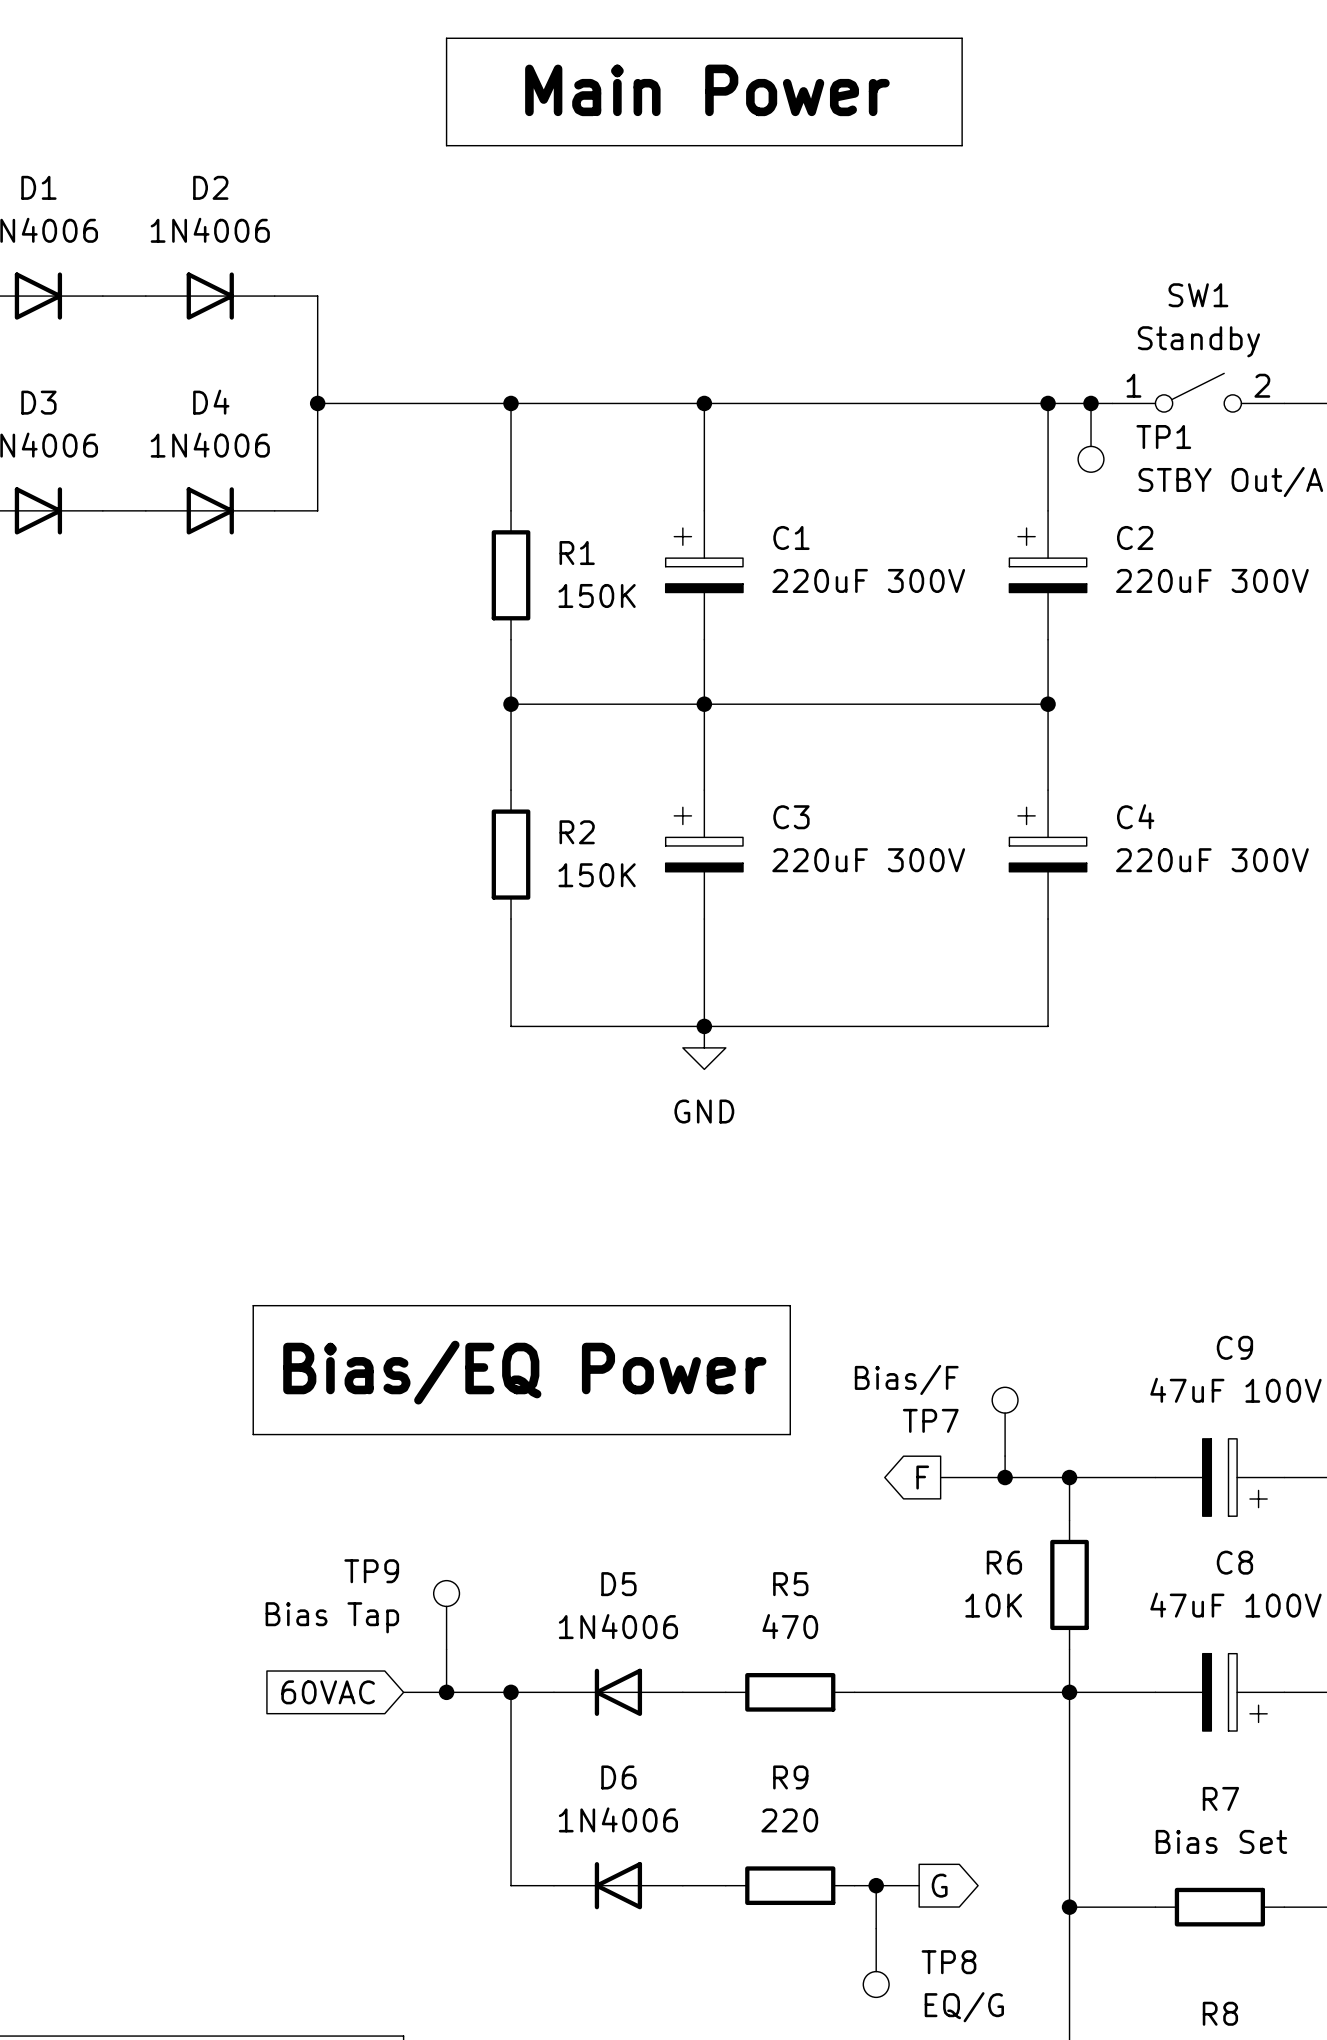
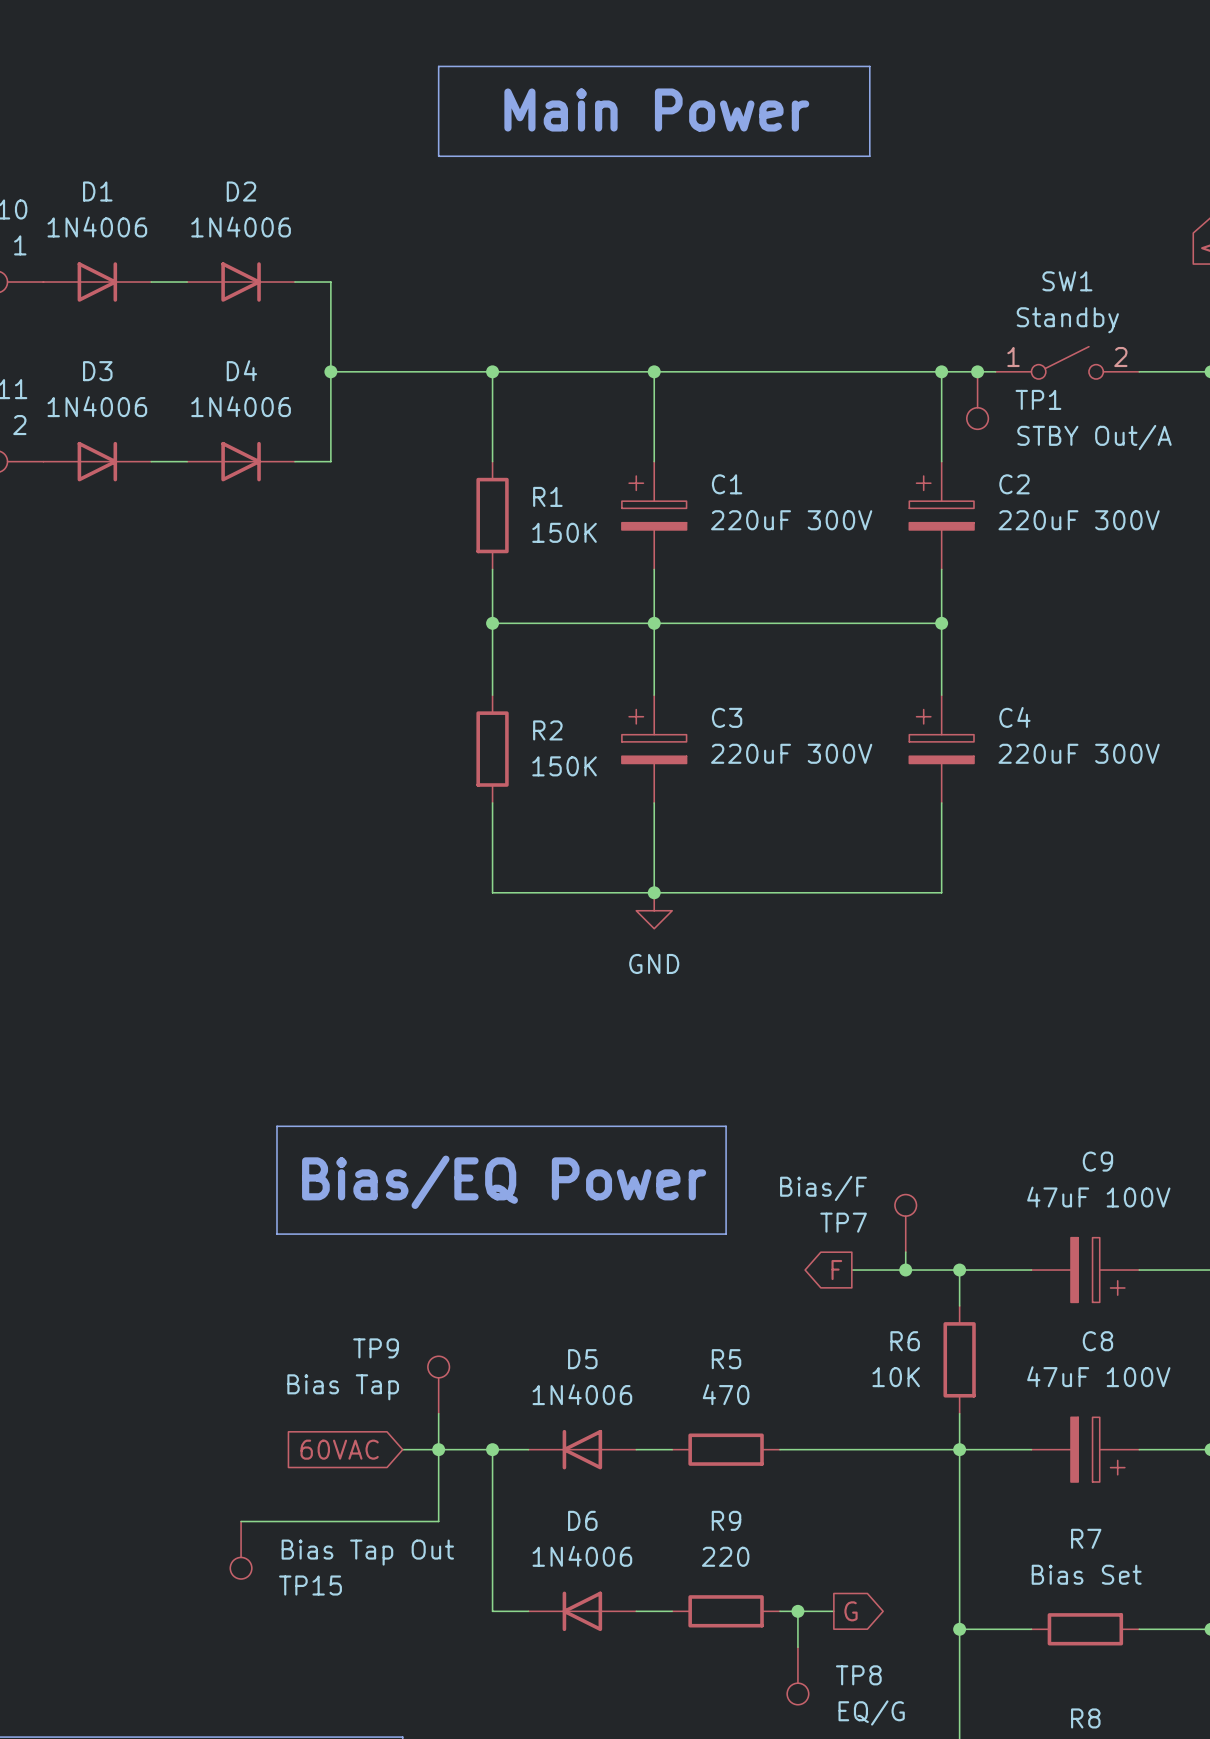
wire: none -> (438, 1449) (438, 1521) (241, 1521)
TP15: none -> Bias Tap Out (241, 1550)

